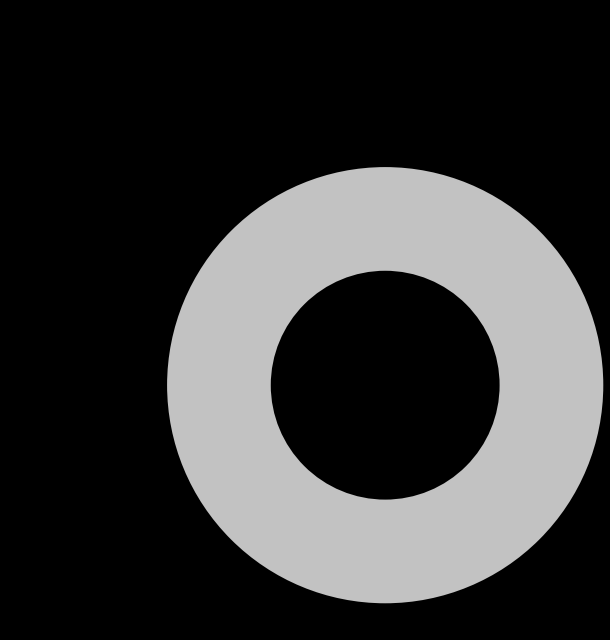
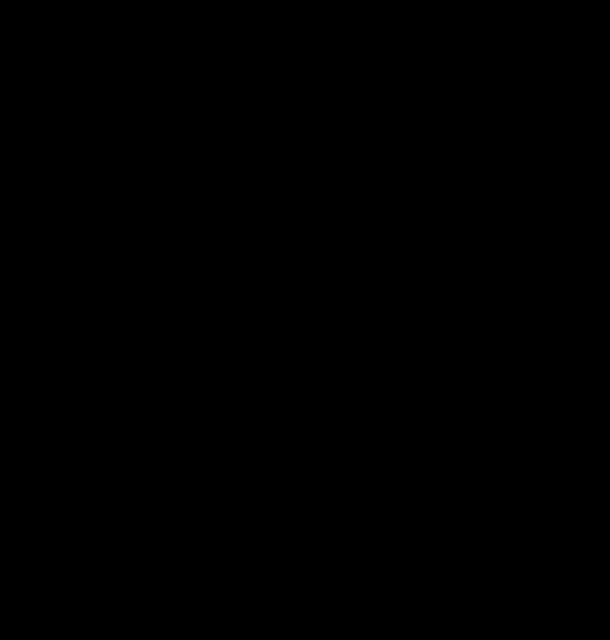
via: (385, 385) -> none

